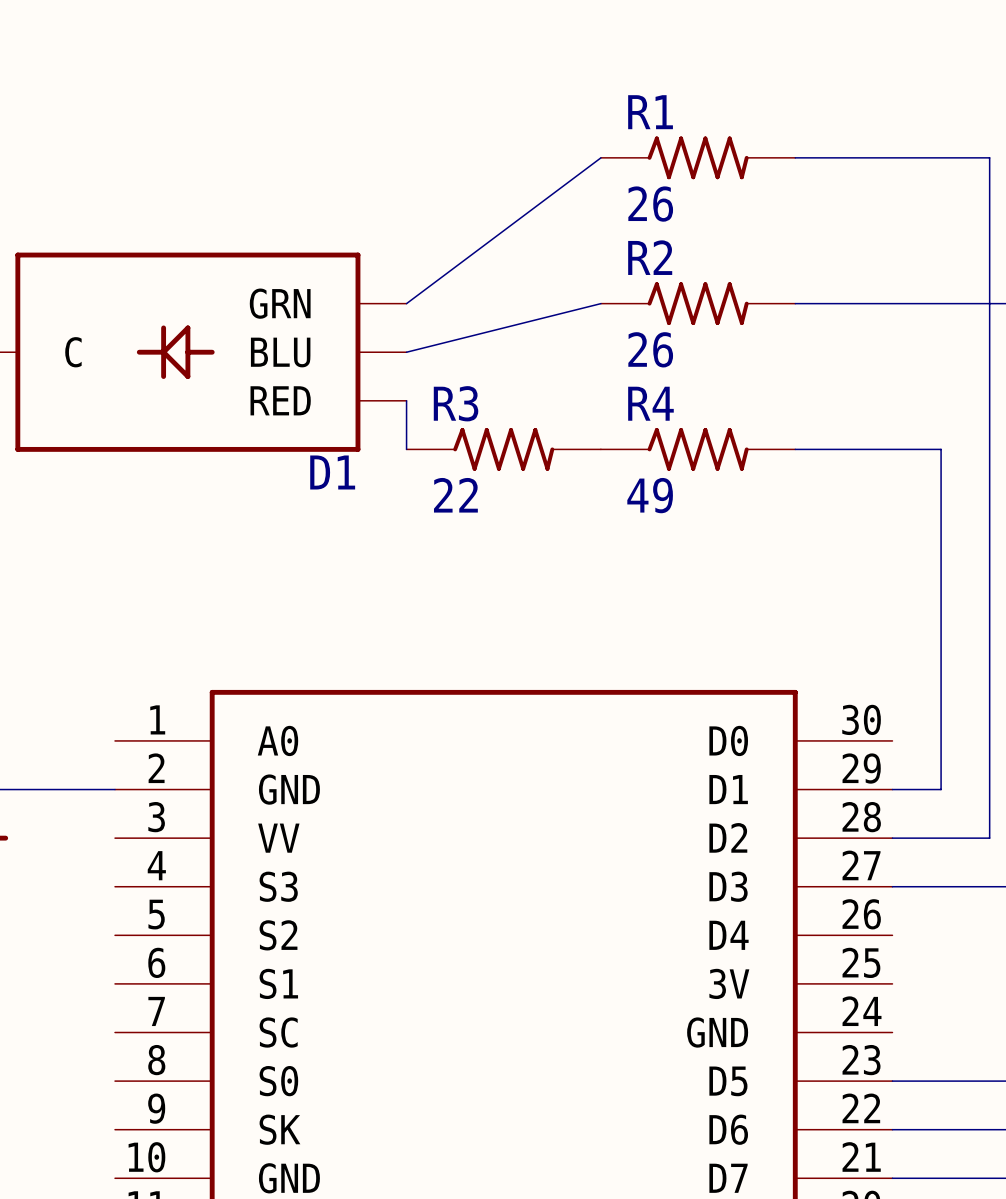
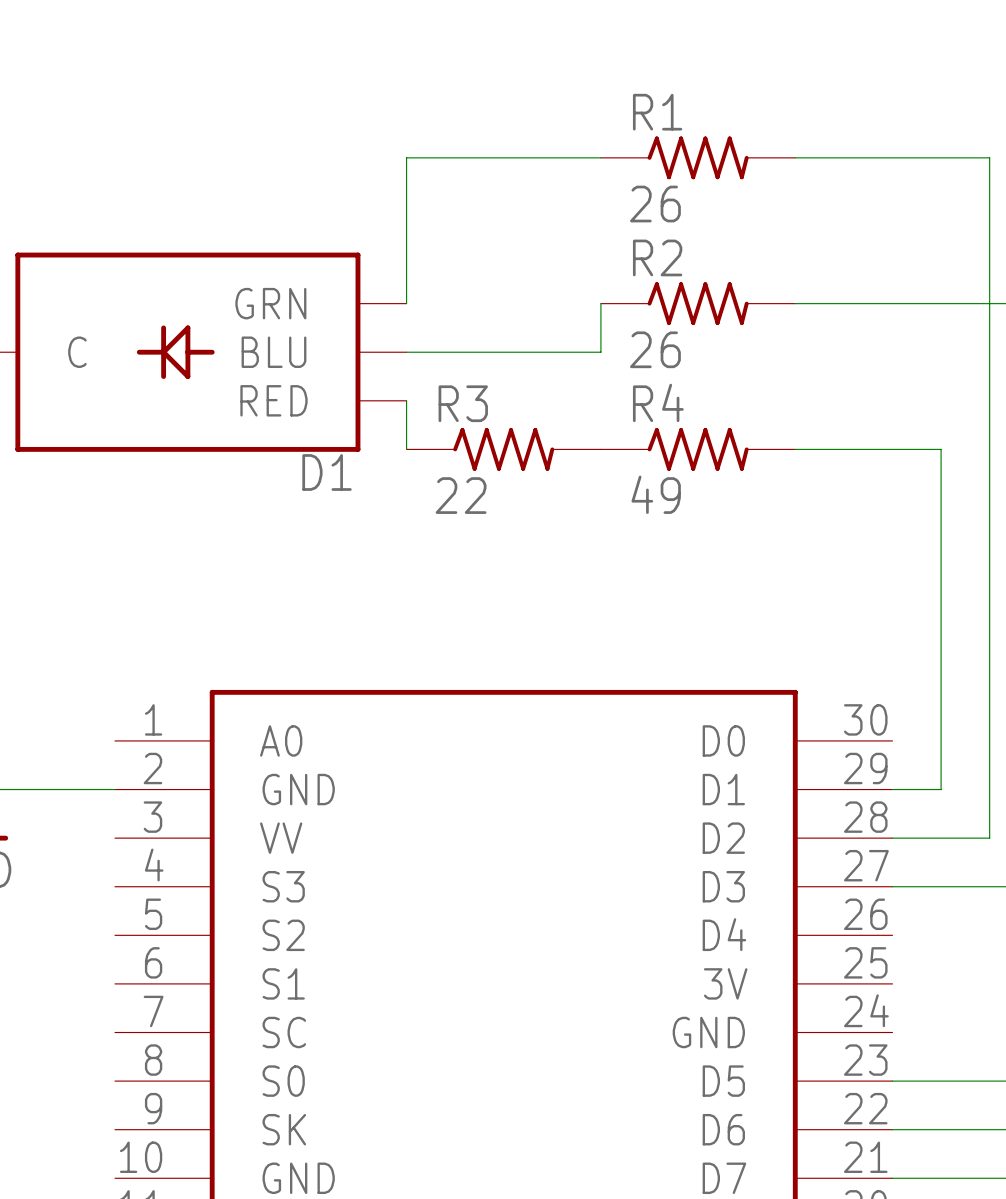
wire: (600, 157) (406, 303) -> (600, 157) (406, 157) (406, 303)
wire: (600, 303) (406, 352) -> (600, 303) (600, 352) (406, 352)

